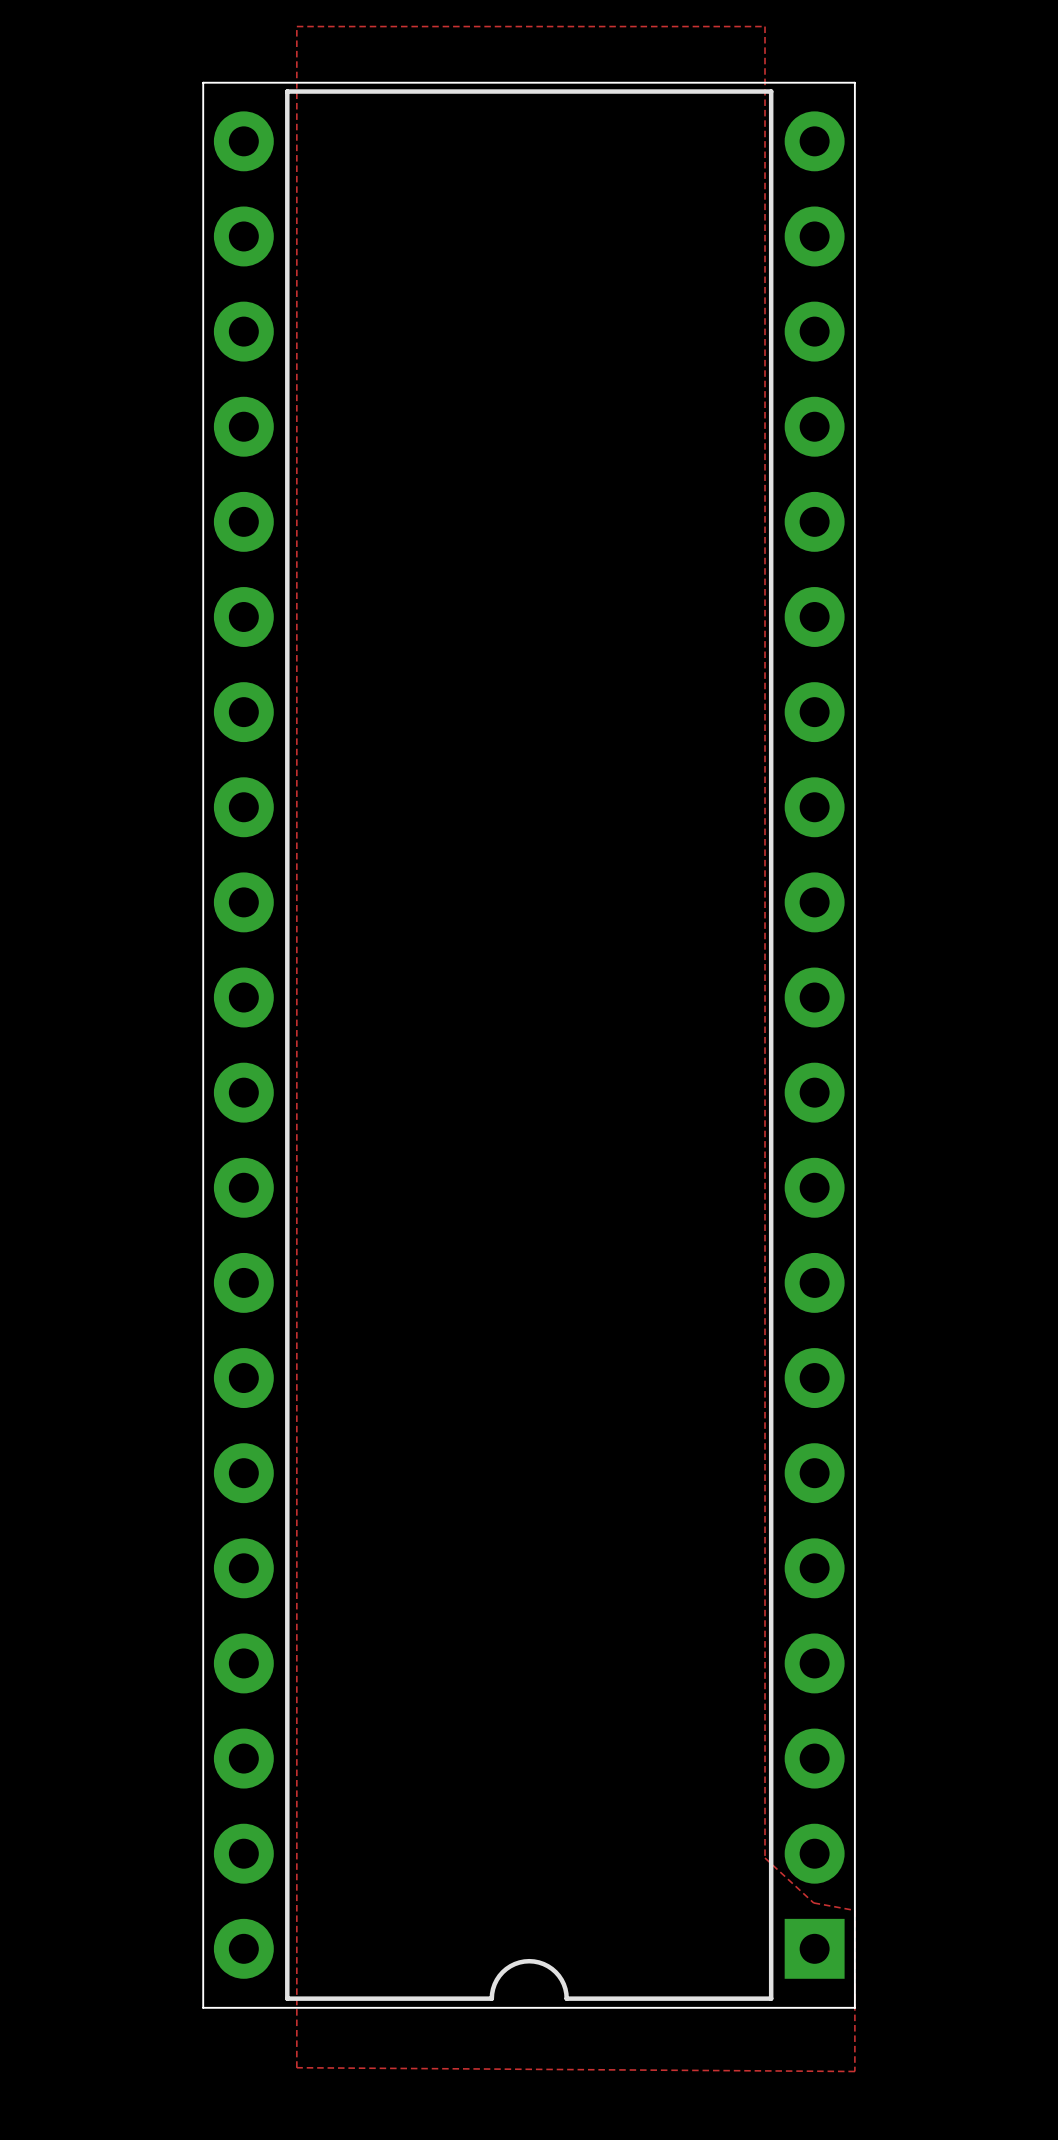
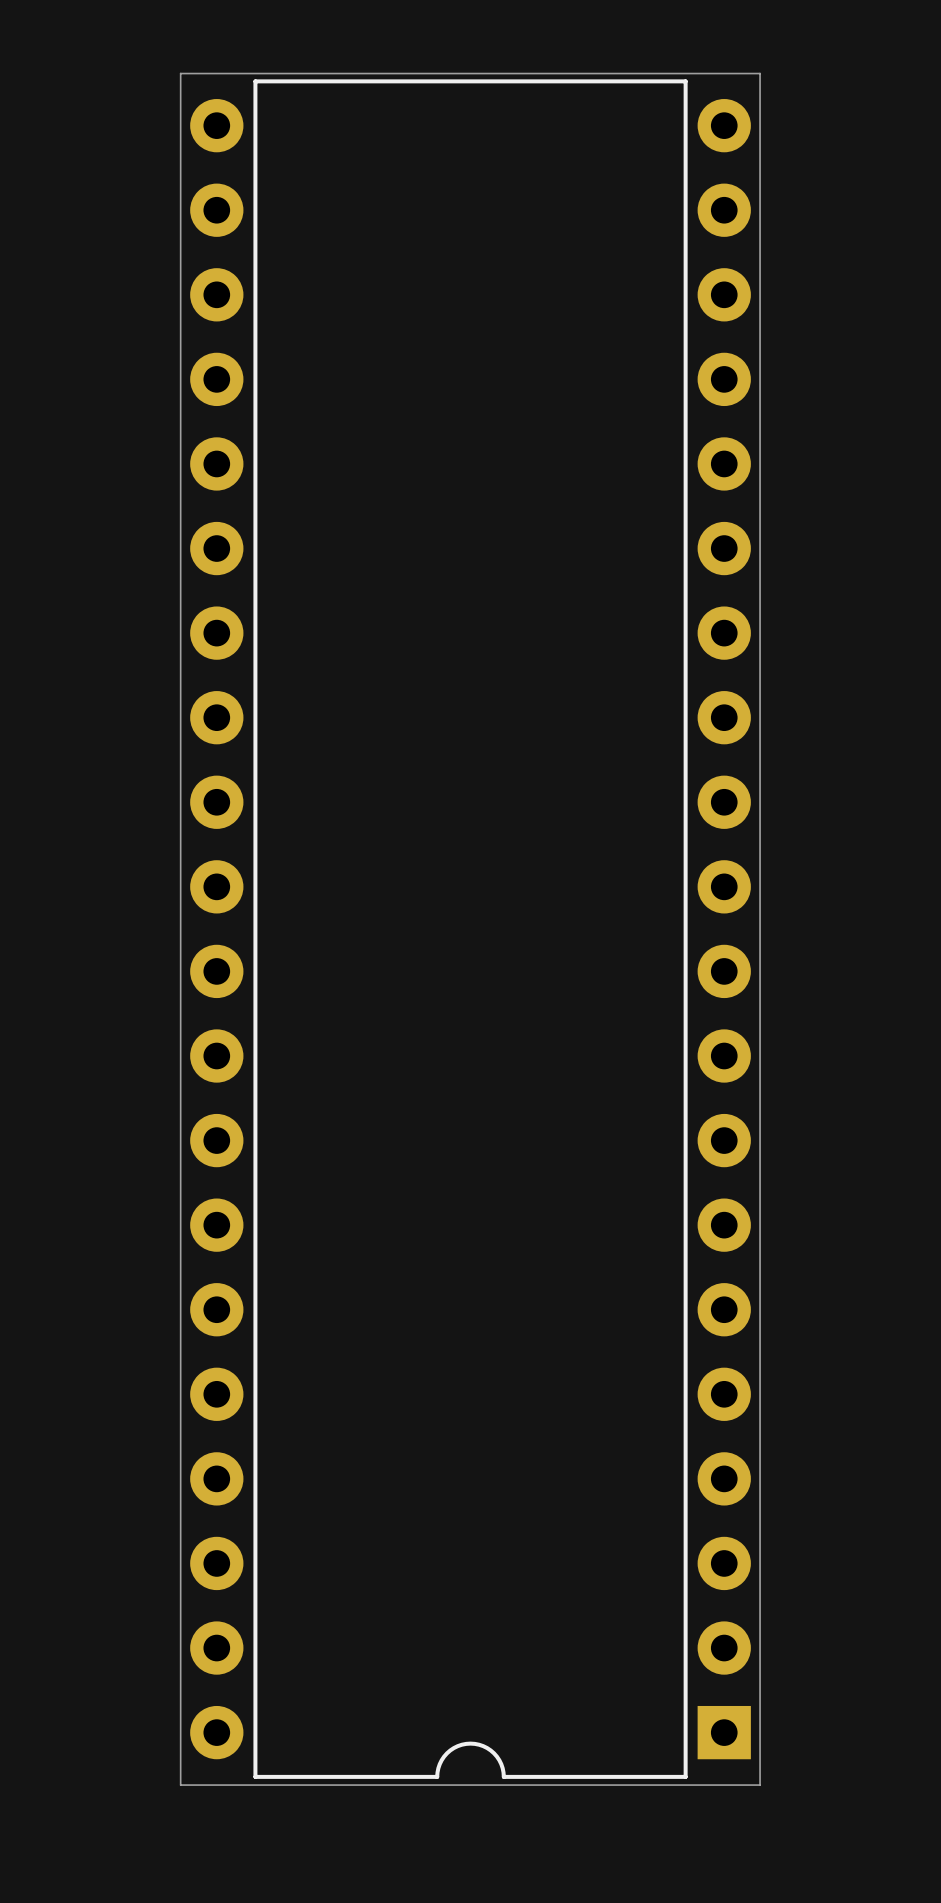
zone outline: (296, 26) (296, 2067) (854, 2071) (854, 1910) (813, 1902) (765, 1858) (765, 26) (296, 26) -> none

